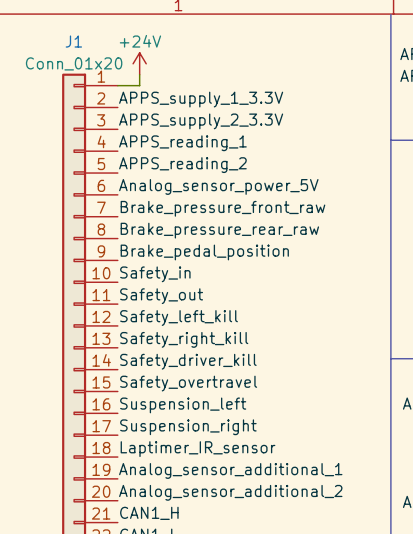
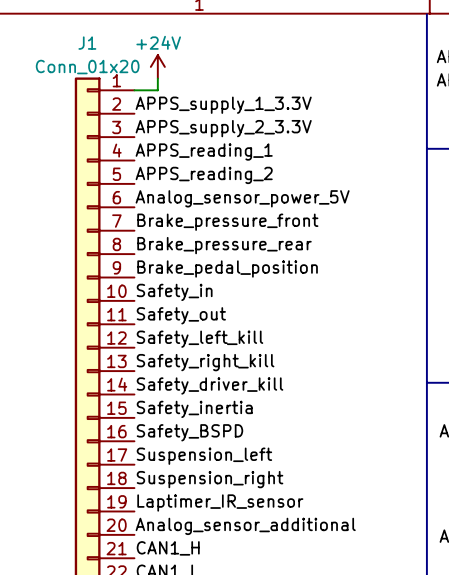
label: Brake_pressure_front_raw (222, 208) -> Brake_pressure_front (227, 222)
label: Brake_pressure_rear_raw (219, 230) -> Brake_pressure_rear (224, 245)
label: Safety_overtravel (188, 383) -> Safety_inertia (194, 409)
label: Suspension_left (183, 405) -> Safety_BSPD (189, 432)
label: Suspension_right (188, 427) -> Suspension_left (204, 456)
label: Laptimer_IR_sensor (198, 449) -> Suspension_right (210, 479)
label: Analog_sensor_additional_1 (230, 470) -> Laptimer_IR_sensor (220, 502)
label: Analog_sensor_additional_2 (230, 492) -> Analog_sensor_additional (245, 526)

